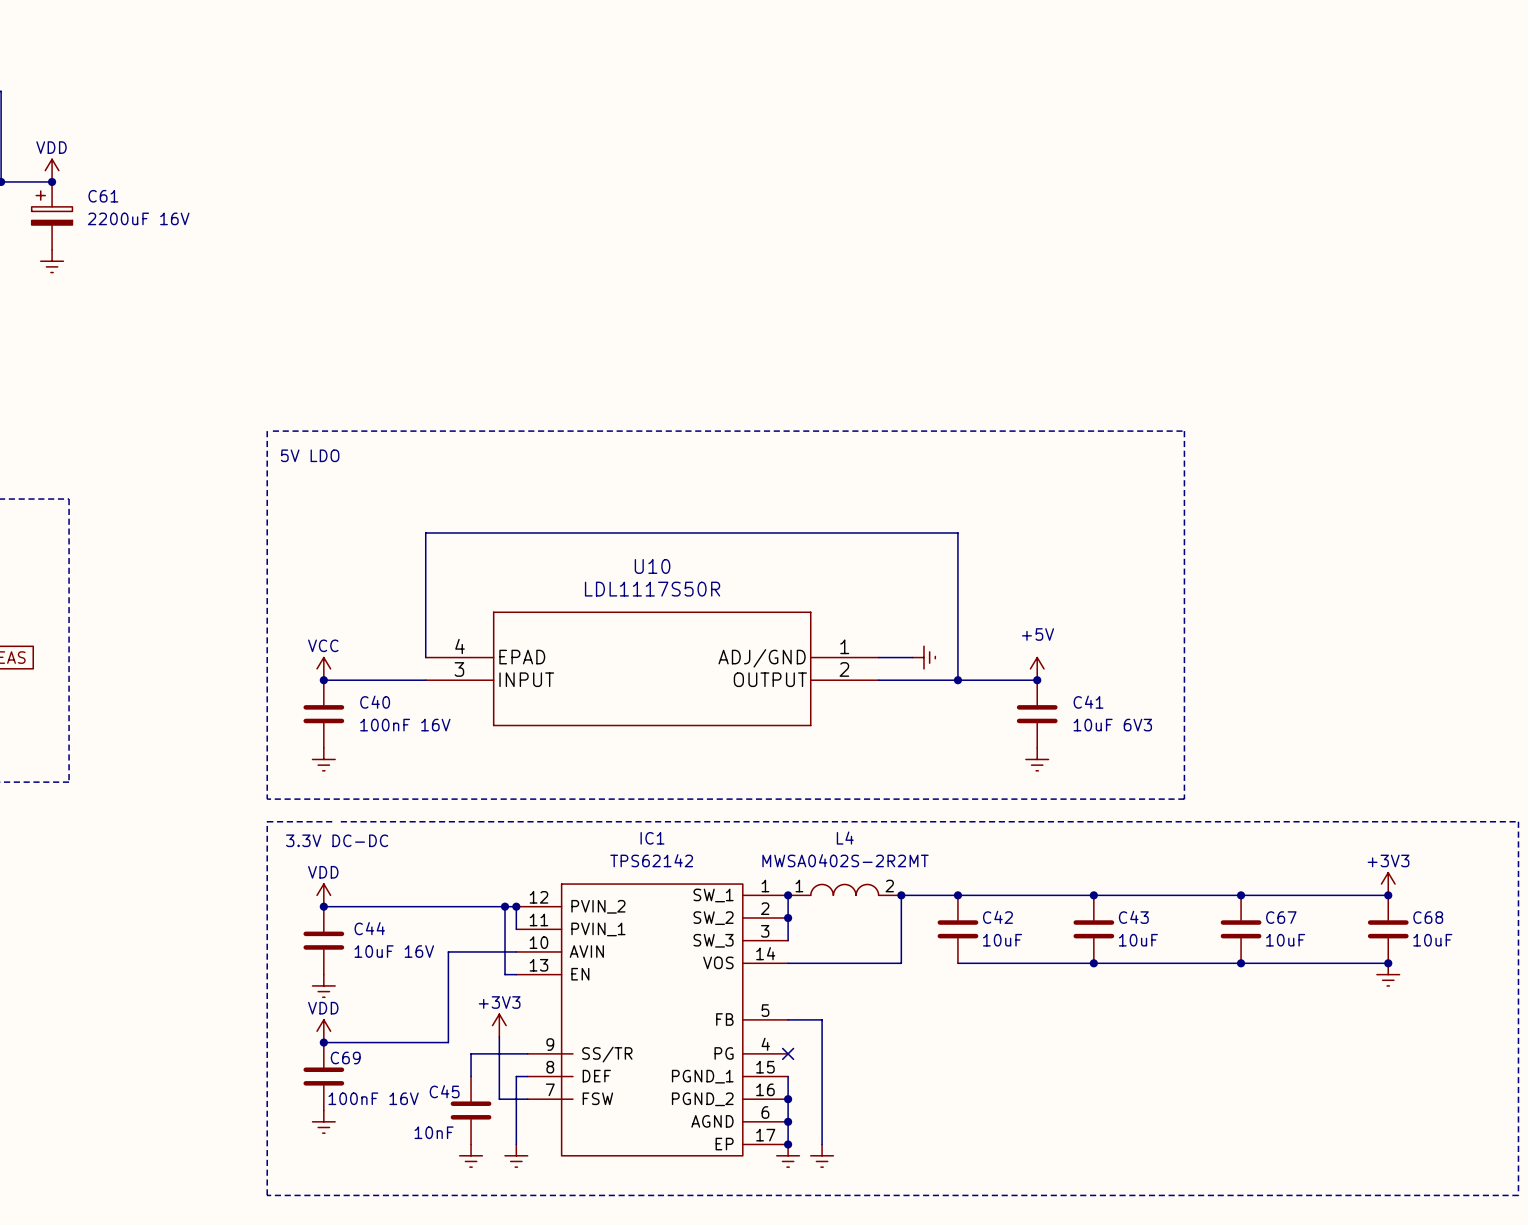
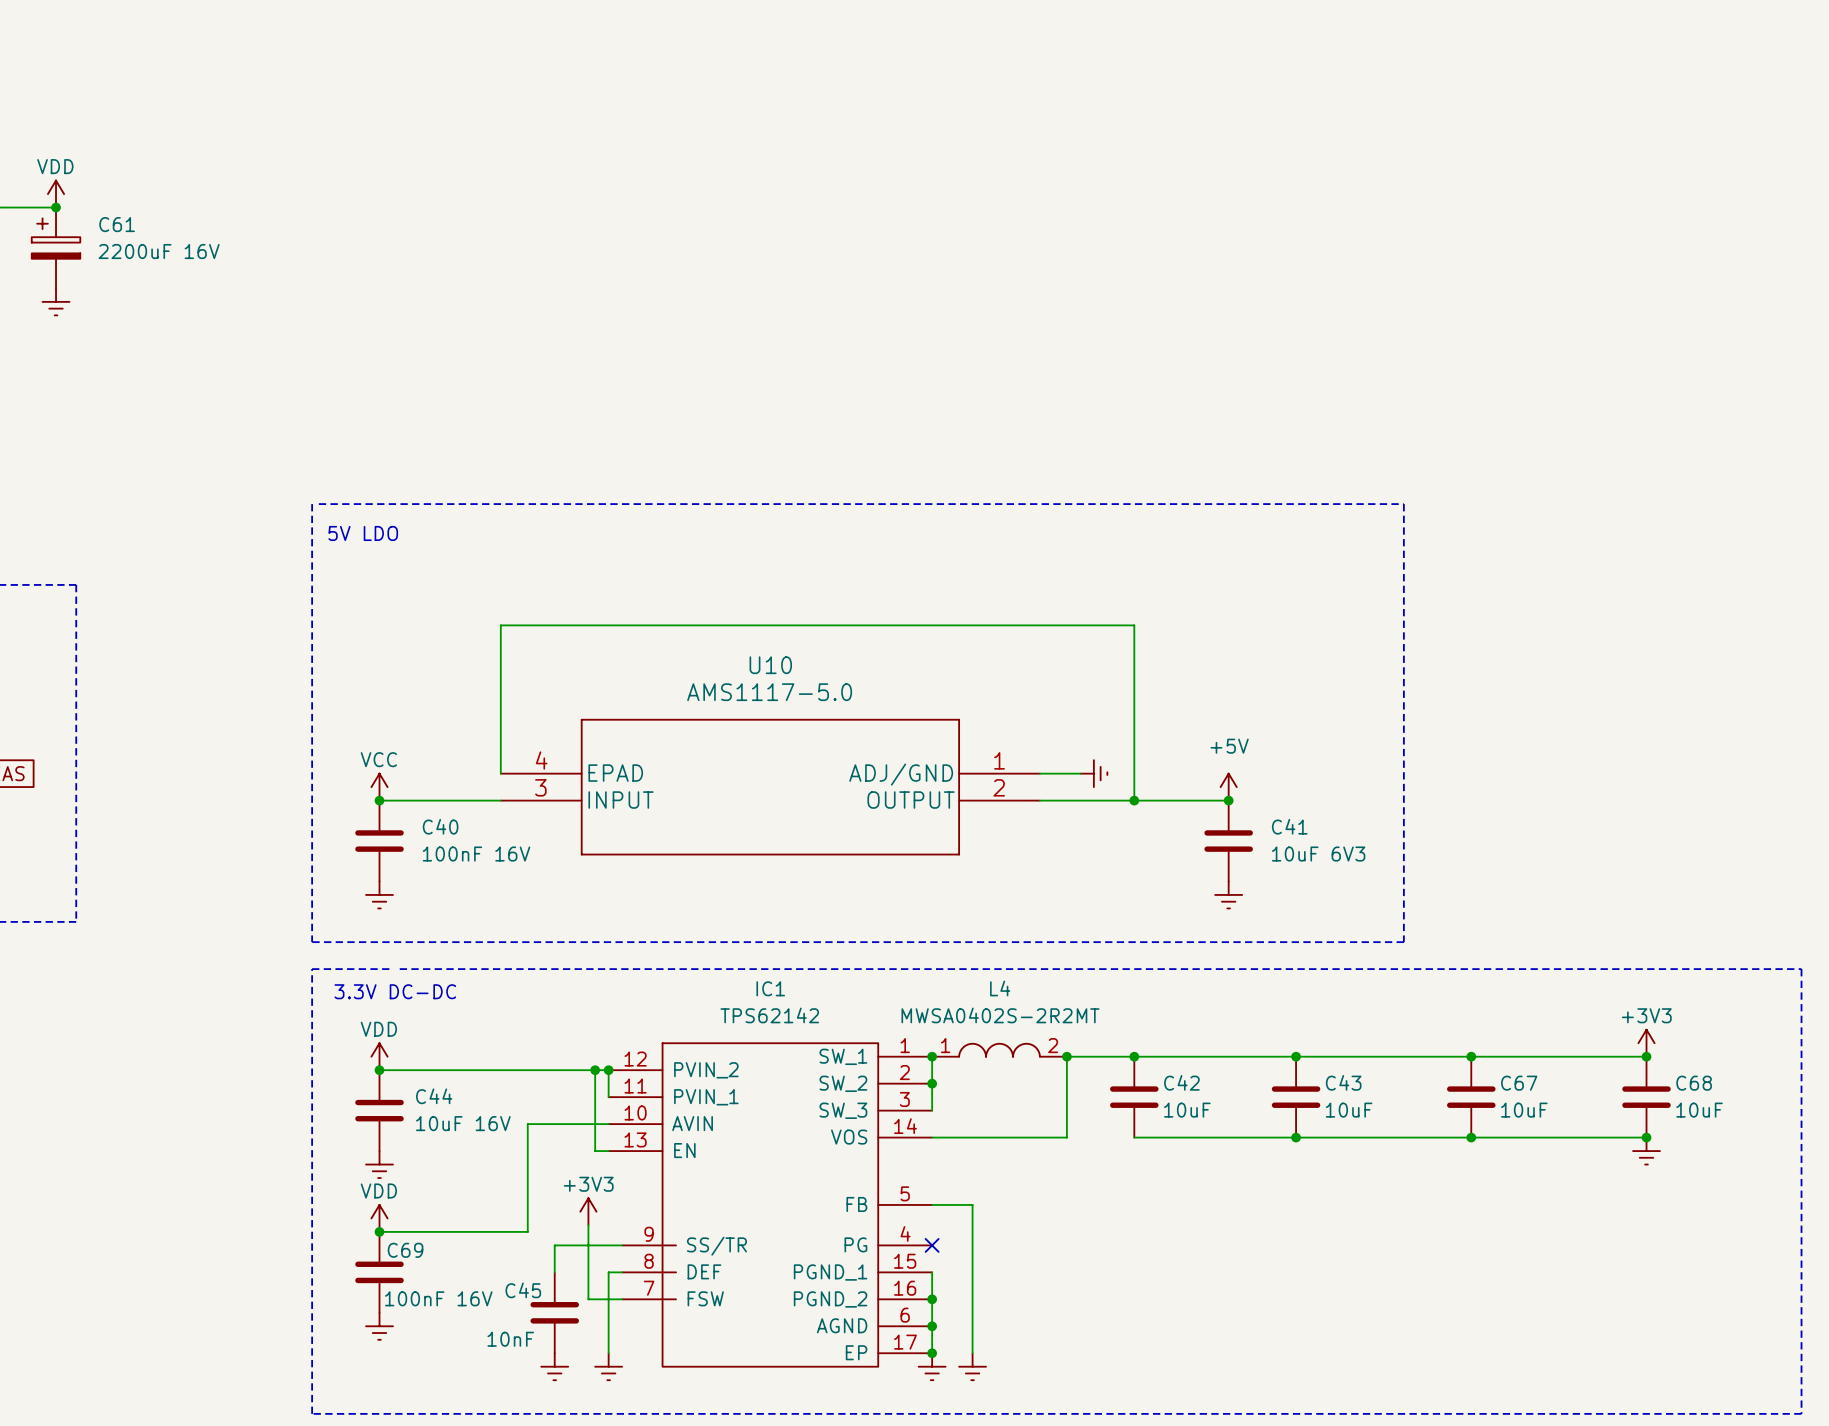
U10 value: LDL1117S50R (652, 589) -> AMS1117-5.0 (769, 692)

